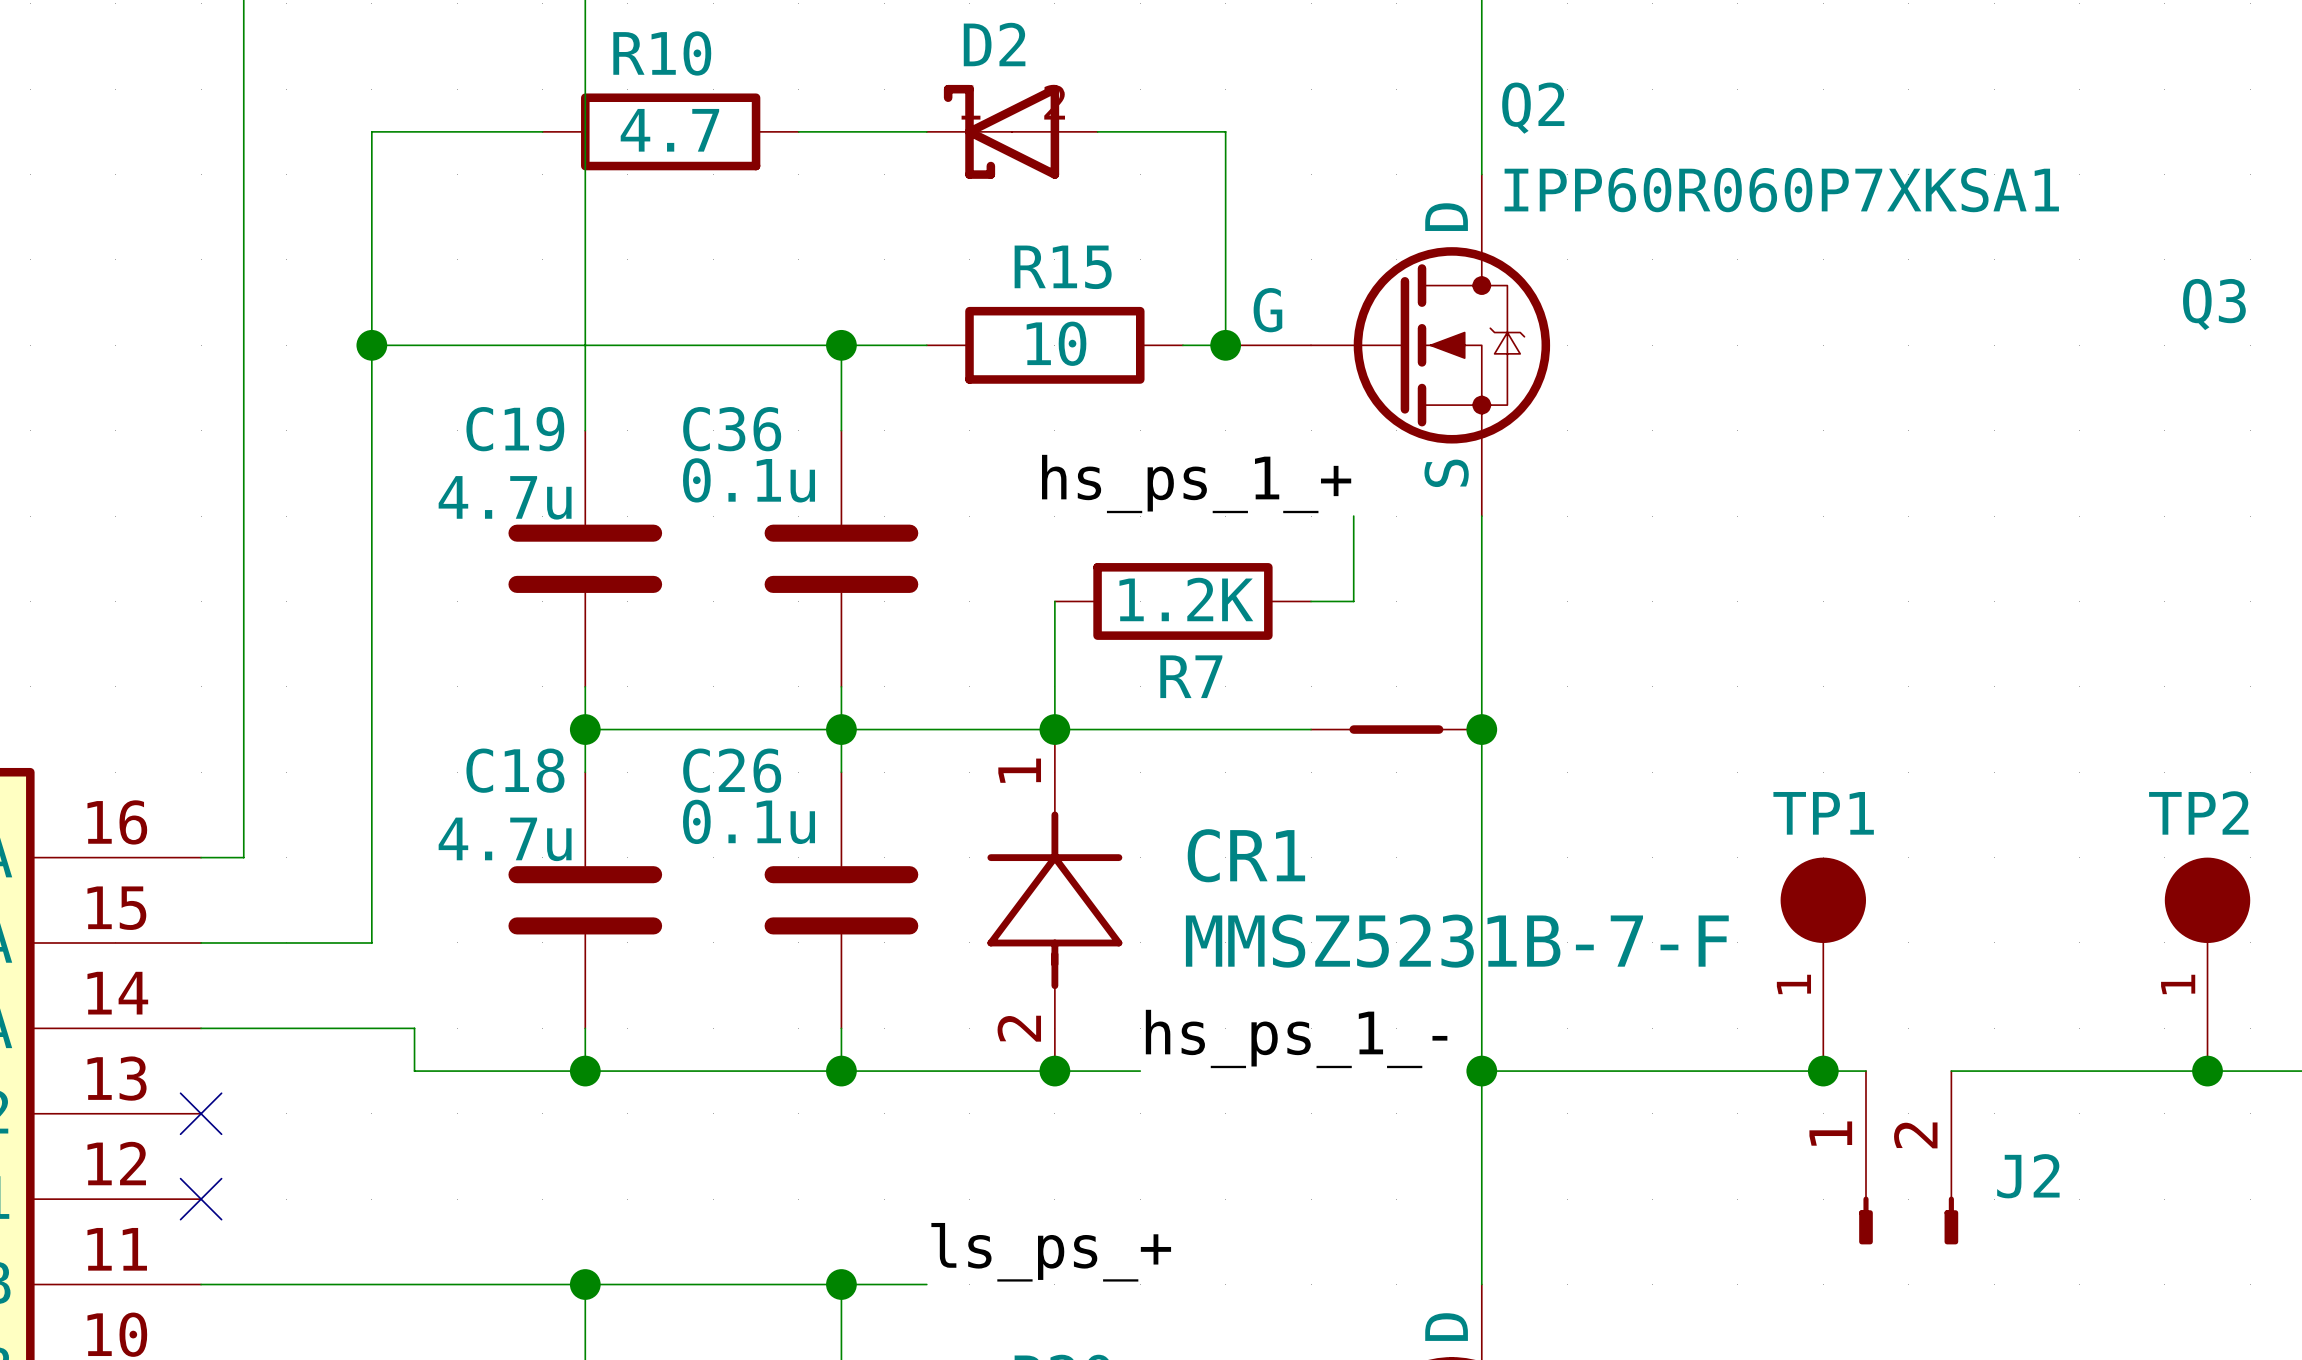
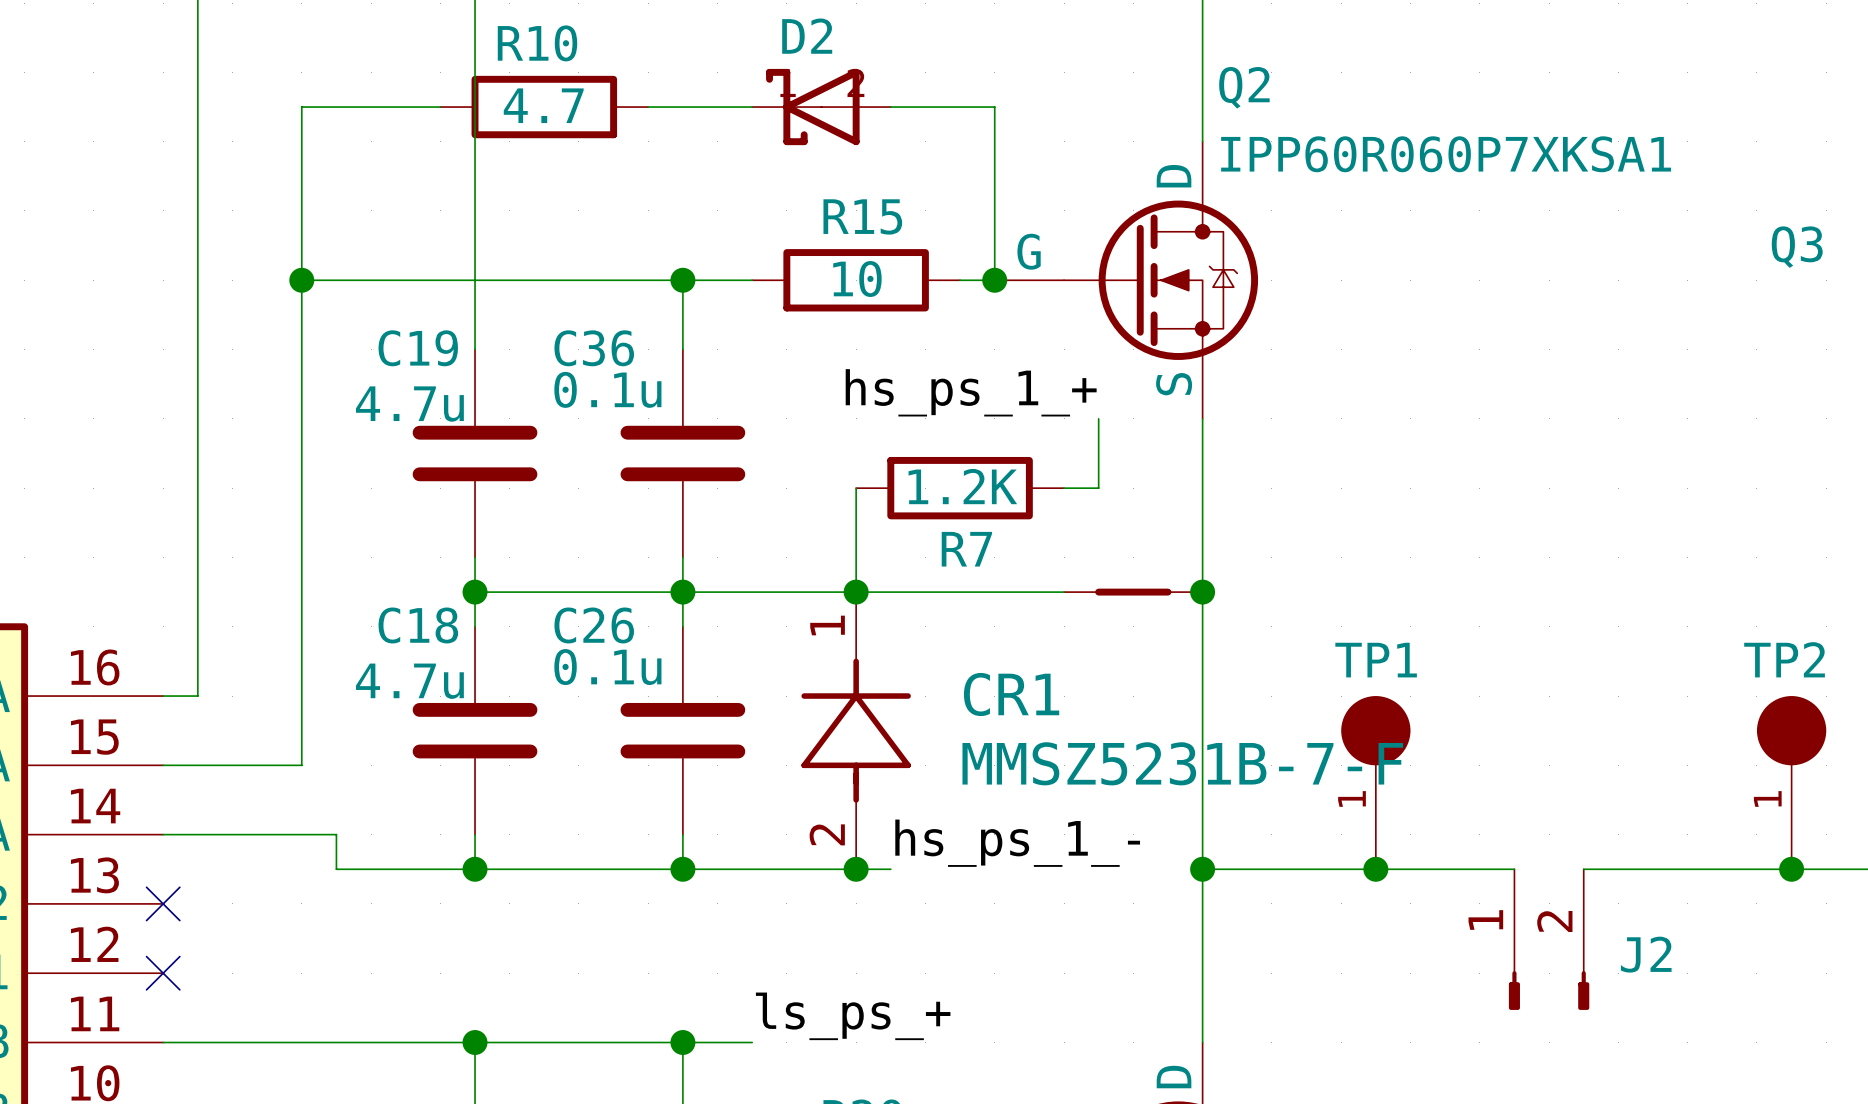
TP1 position: (1823, 964) -> (1375, 782)
label position: hs_ps_1_- (1296, 1038) -> hs_ps_1_- (1017, 843)
wire: (1097, 1071) (1140, 1071) -> none
junction position: (1823, 1071) -> (1375, 869)

